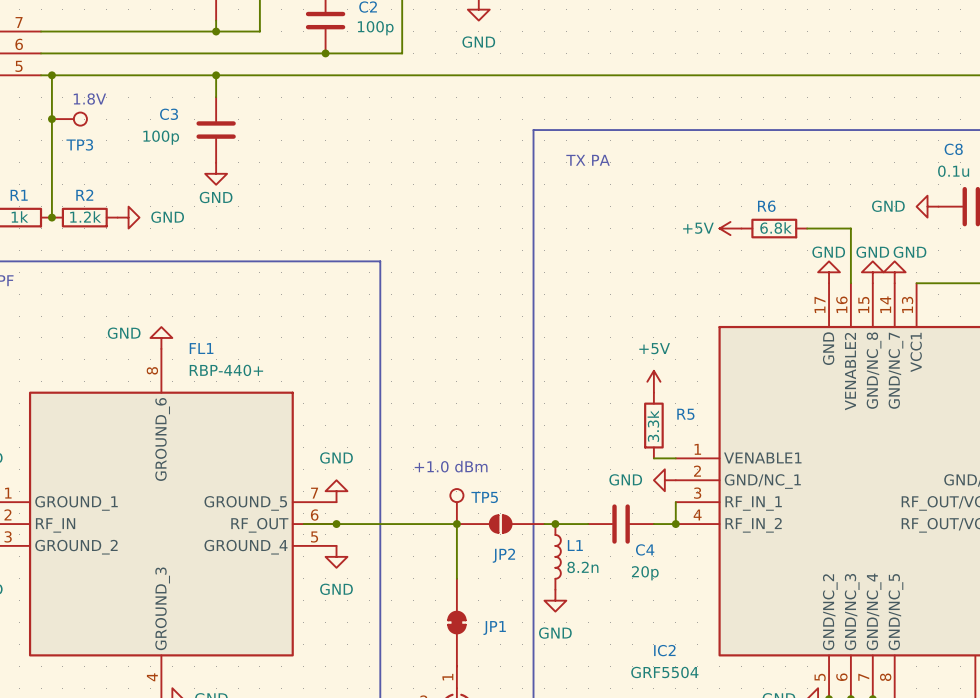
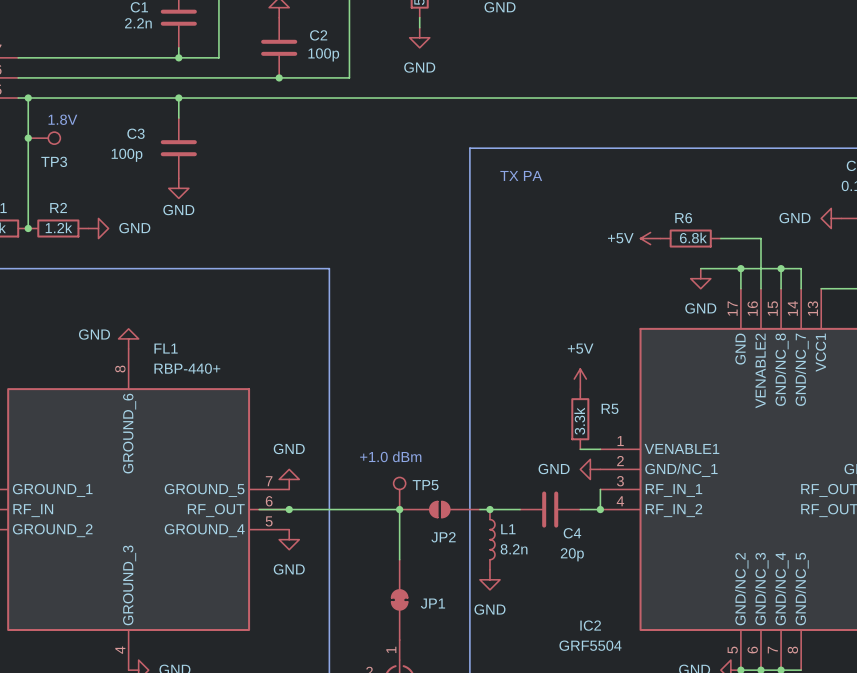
wire: none -> (700, 268) (801, 268) (801, 288)
junction: none -> (740, 268)
junction: none -> (781, 268)
power symbol: none -> GND (700, 278)
power symbol: GND (829, 272) -> none
power symbol: GND (872, 272) -> none
power symbol: GND (894, 272) -> none

